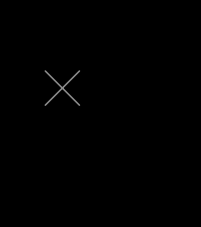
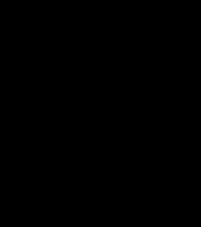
no-connect mark: (62, 88) -> none

